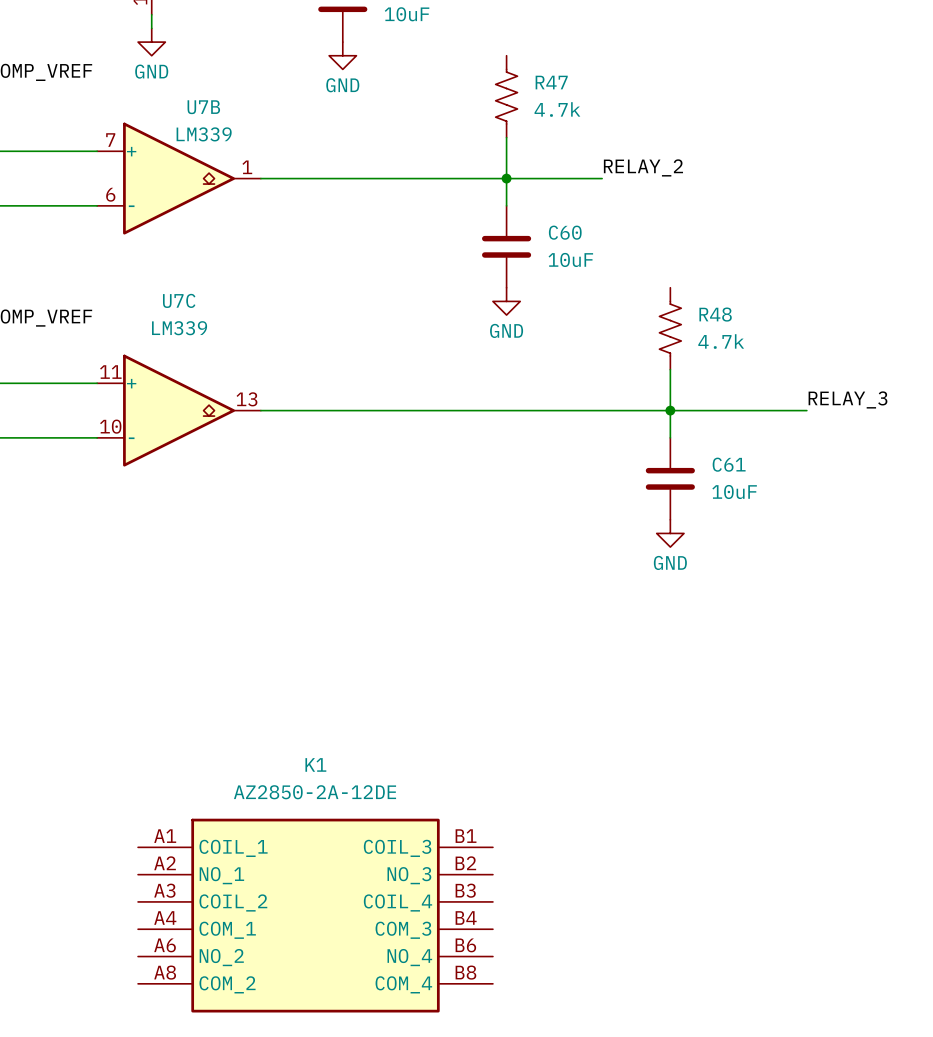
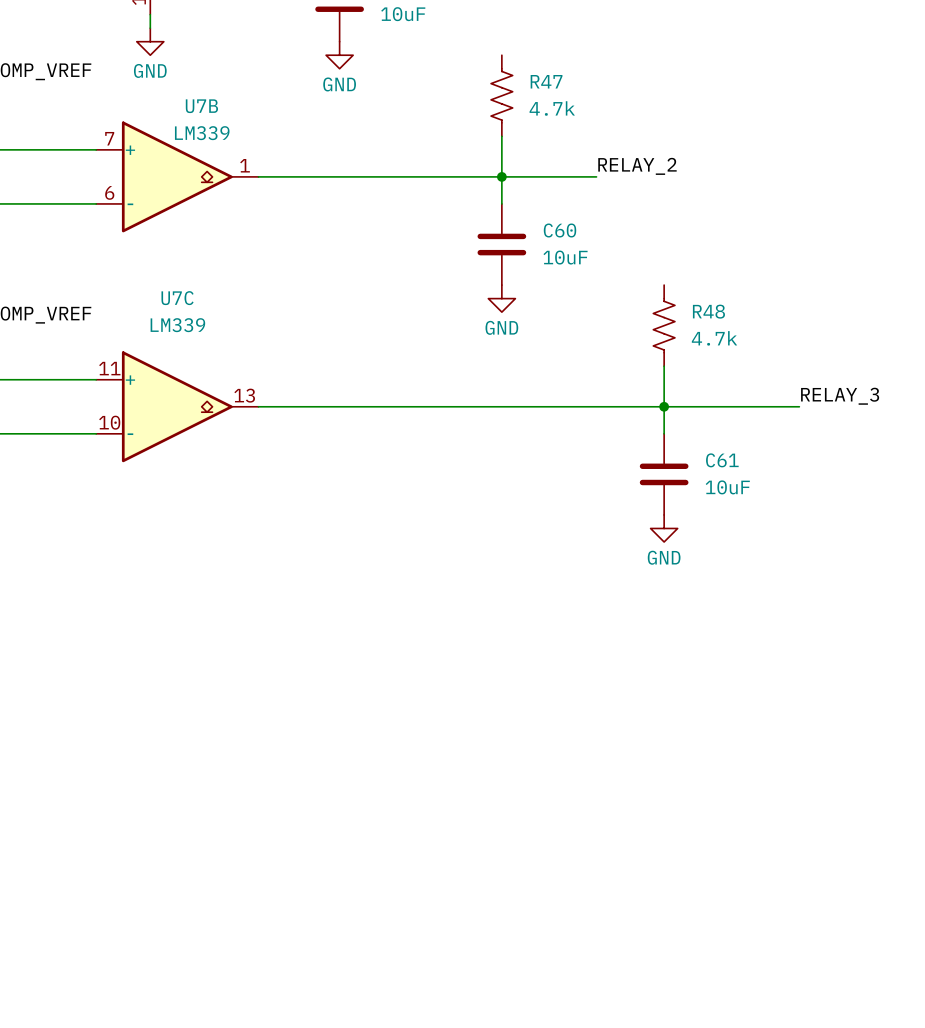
K1: AZ2850-2A-12DE (315, 915) -> none

